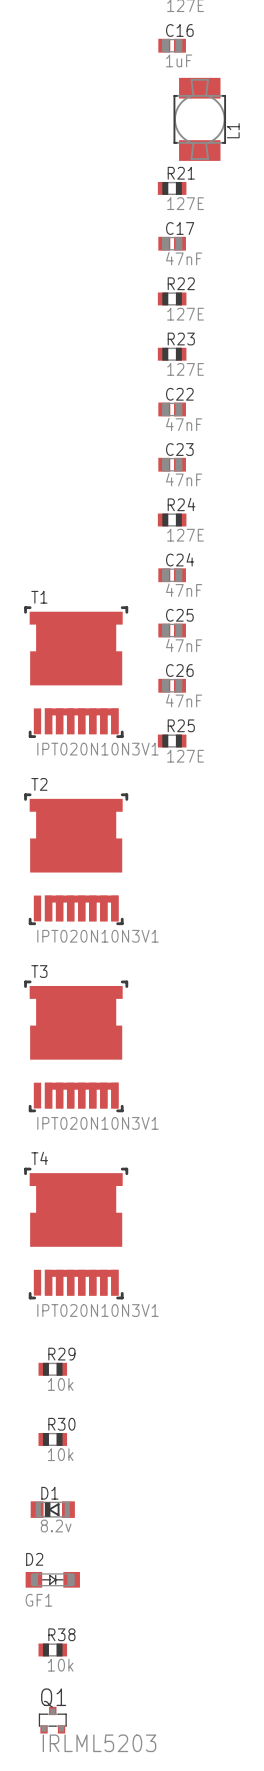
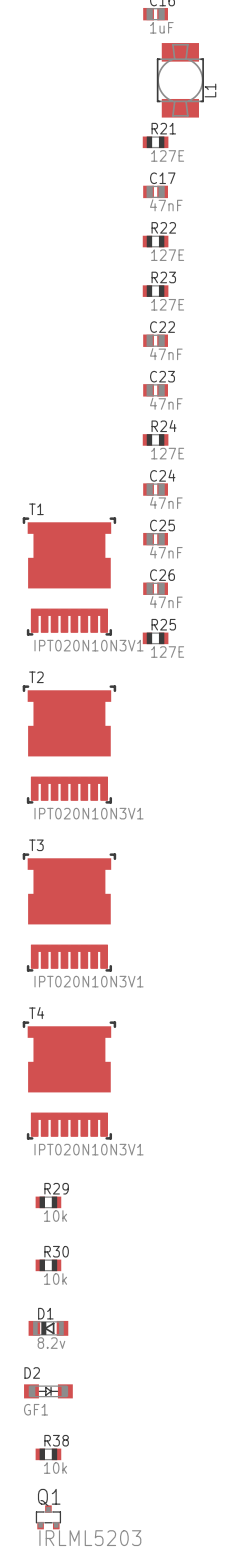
T1 footprint: [17, 606, 129, 745] -> [16, 517, 117, 642]
T2 footprint: [17, 793, 129, 933] -> [16, 685, 117, 810]
T3 footprint: [17, 980, 129, 1120] -> [16, 853, 117, 978]
T4 footprint: [17, 1167, 129, 1307] -> [16, 1021, 117, 1146]

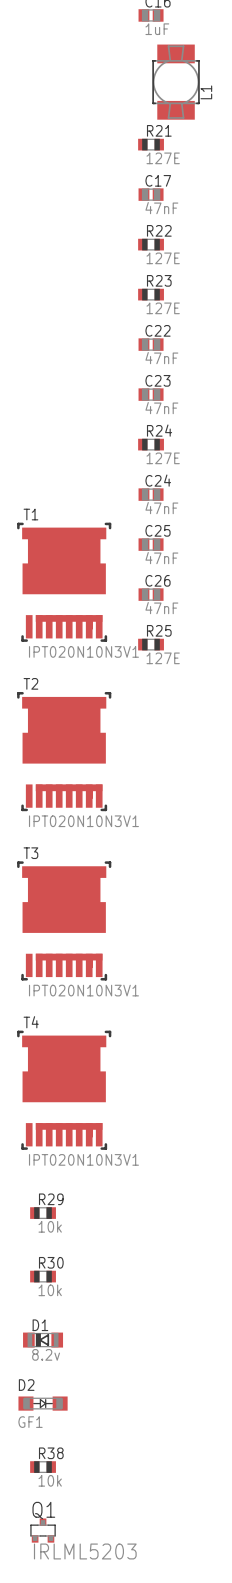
T1 footprint: [16, 517, 117, 642] -> [10, 522, 112, 649]
T2 footprint: [16, 685, 117, 810] -> [10, 691, 112, 818]
T3 footprint: [16, 853, 117, 978] -> [10, 861, 112, 987]
T4 footprint: [16, 1021, 117, 1146] -> [10, 1030, 112, 1157]

